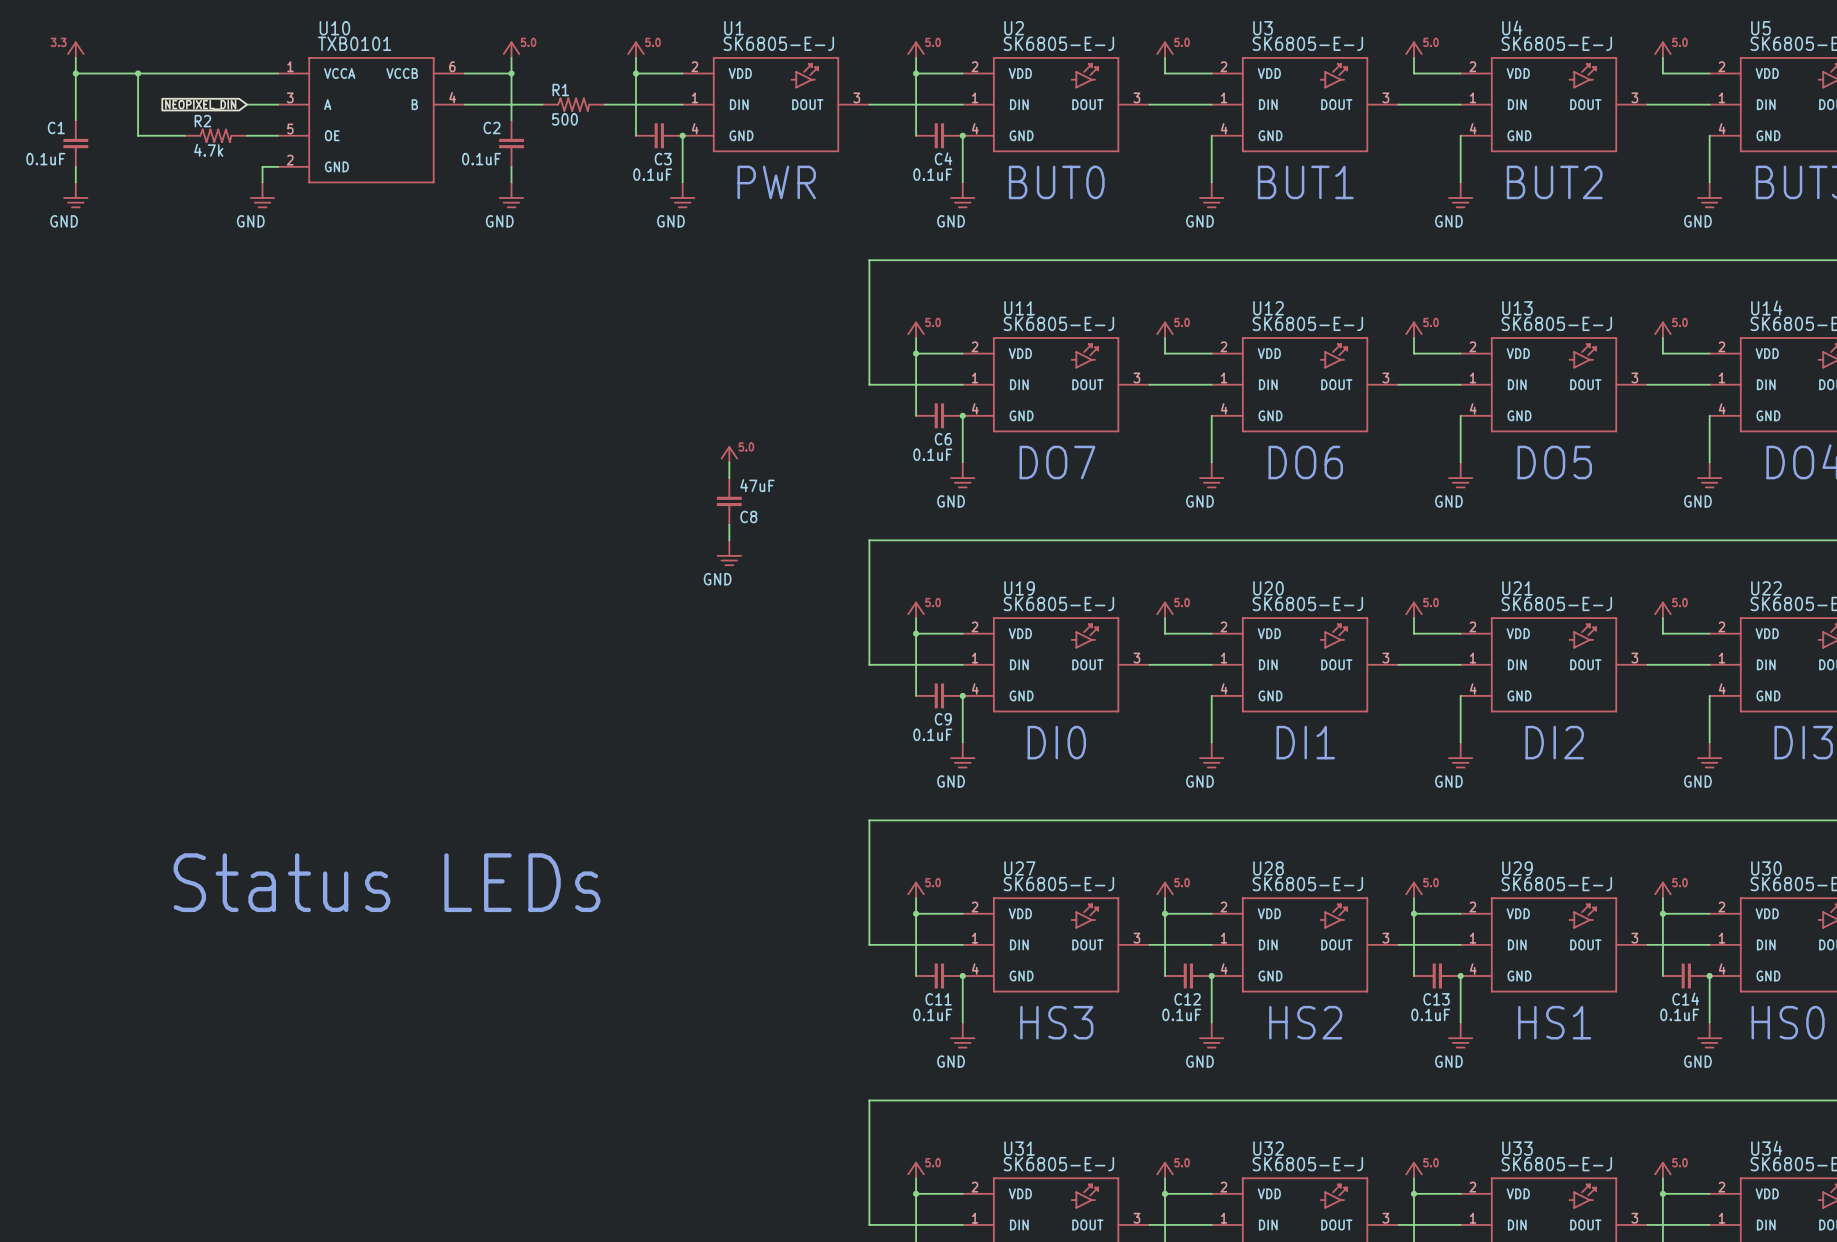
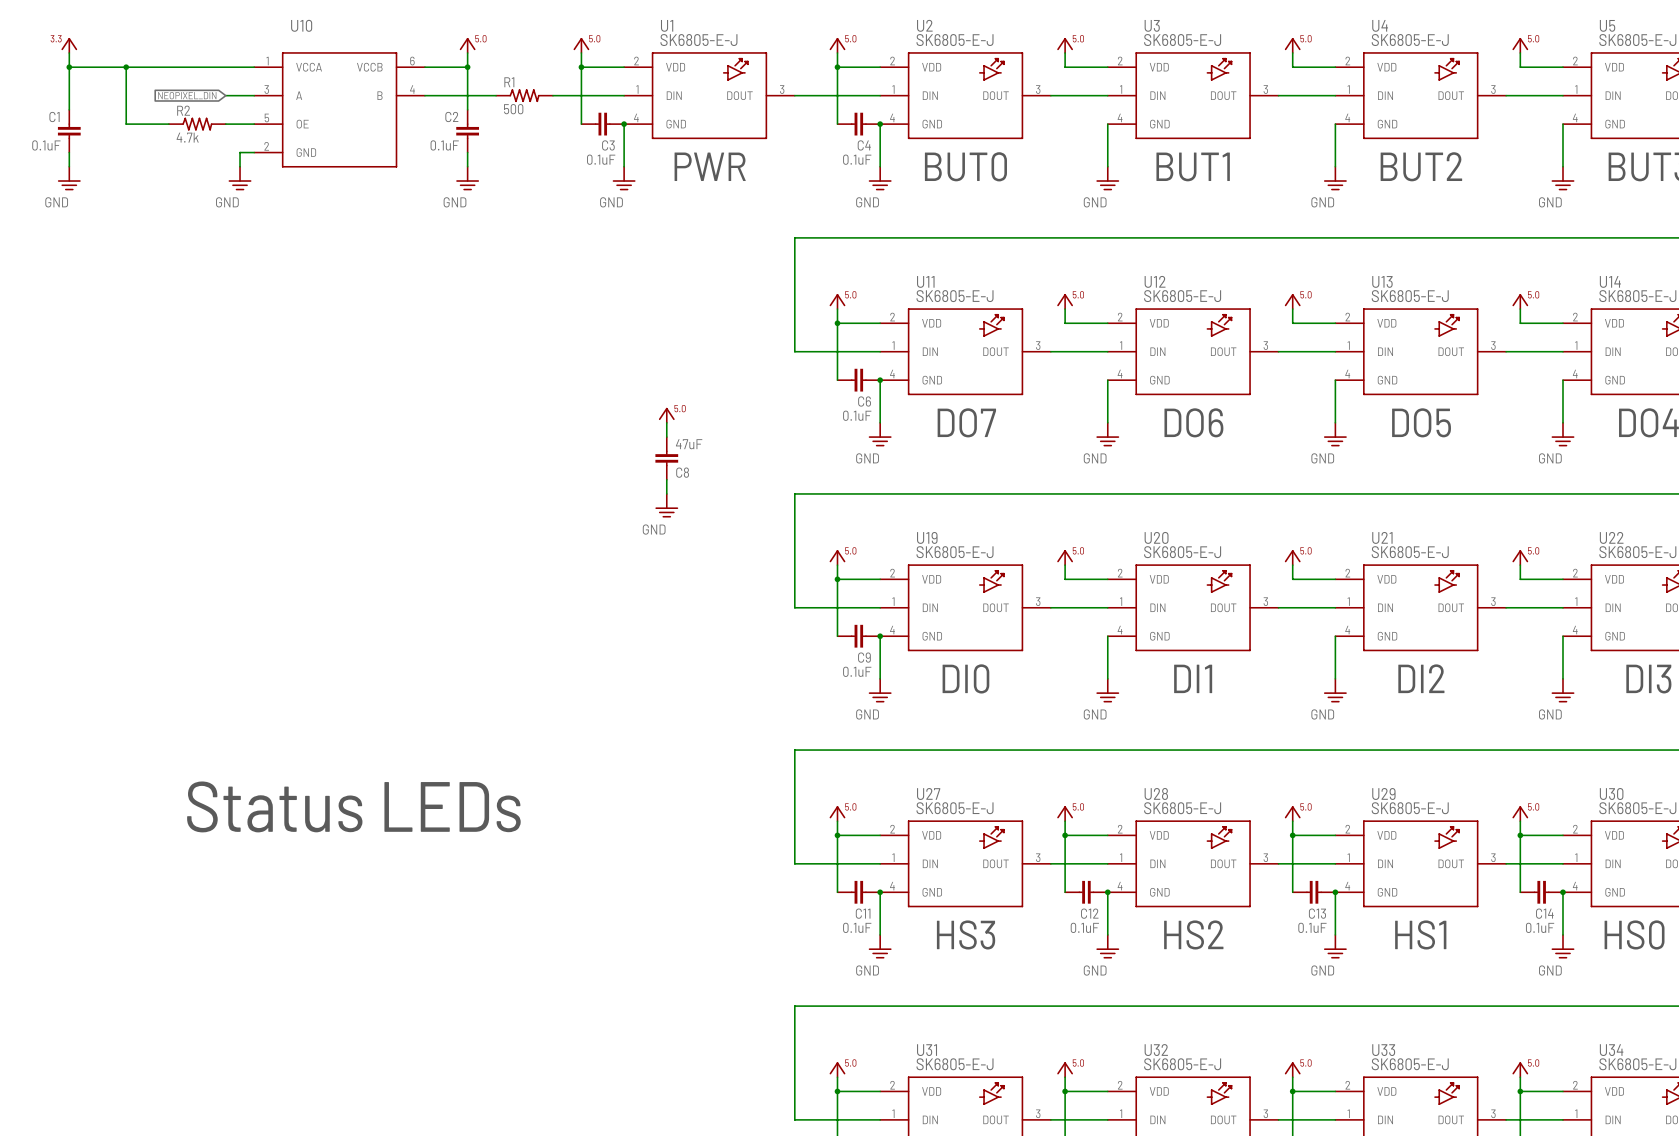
U10 value: TXB0101 (354, 43) -> none

